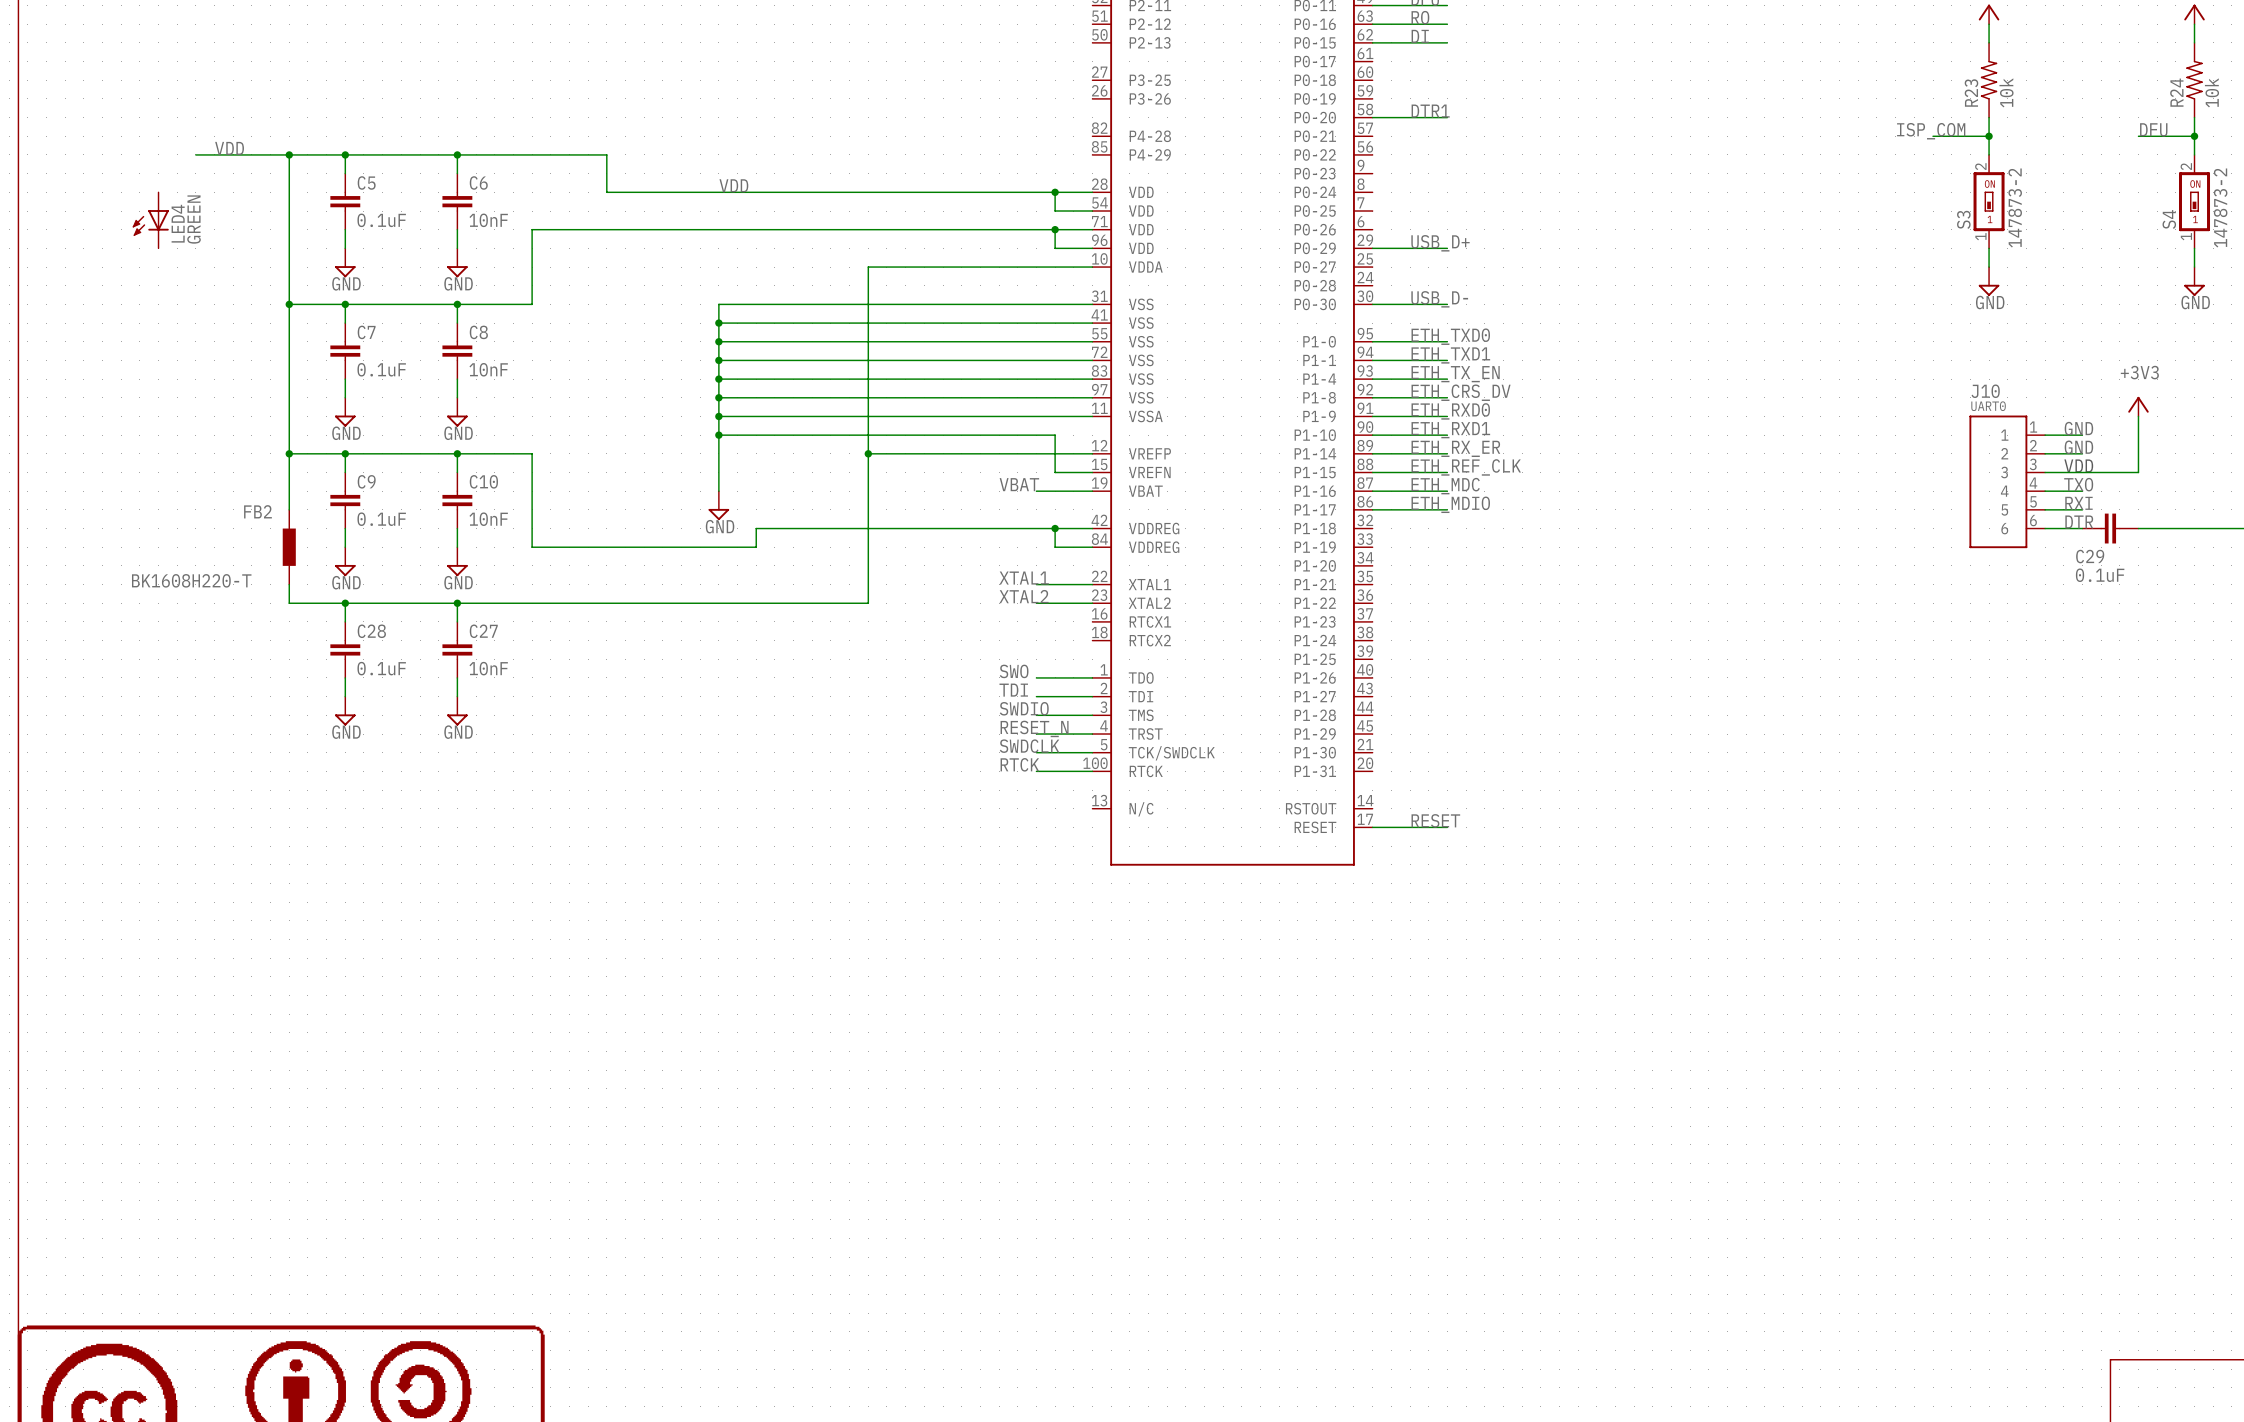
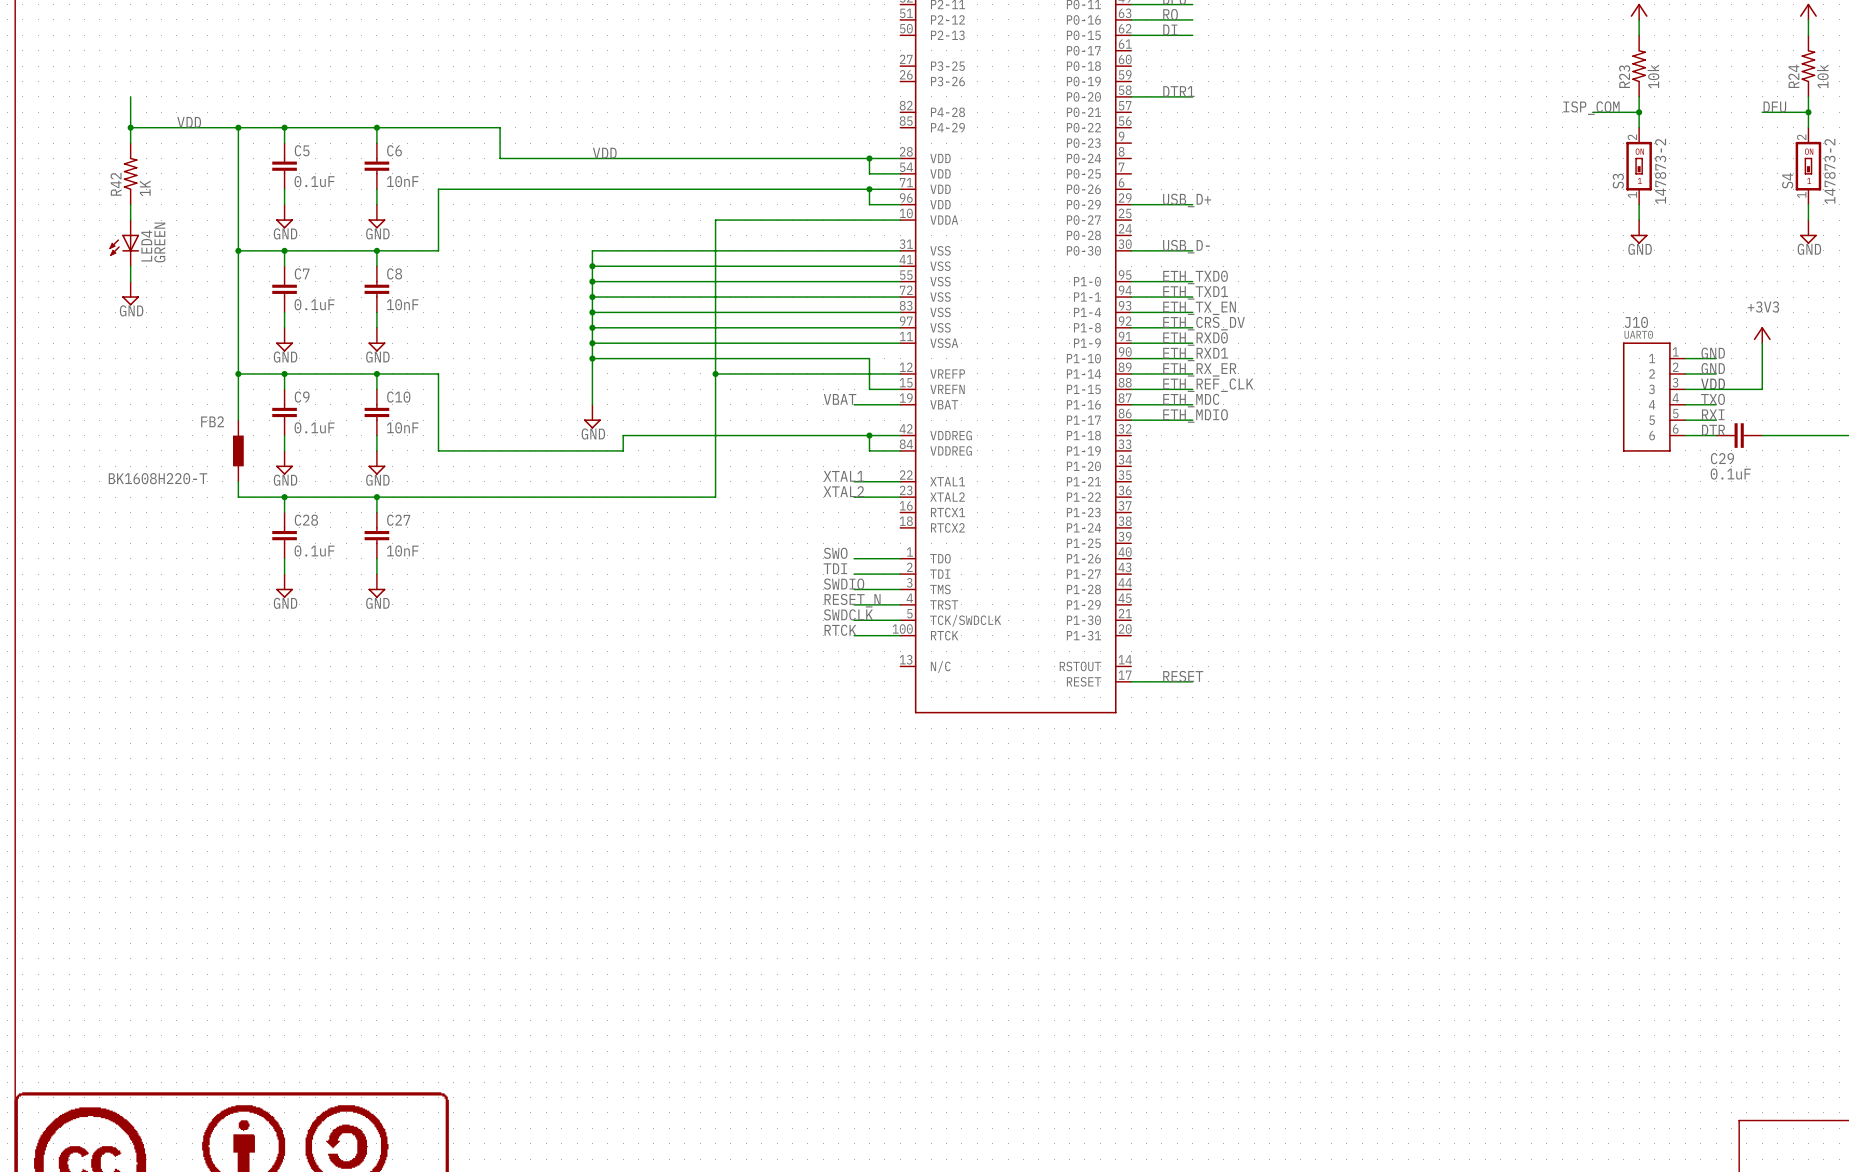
wire: none -> (130, 96) (130, 143)
wire: none -> (130, 127) (161, 127)
junction: none -> (130, 127)
R42: none -> 1K (130, 173)
LED4 position: (150, 220) -> (124, 243)
wire: none -> (130, 204) (130, 220)
wire: none -> (130, 266) (130, 281)
power symbol: none -> GND (130, 293)

